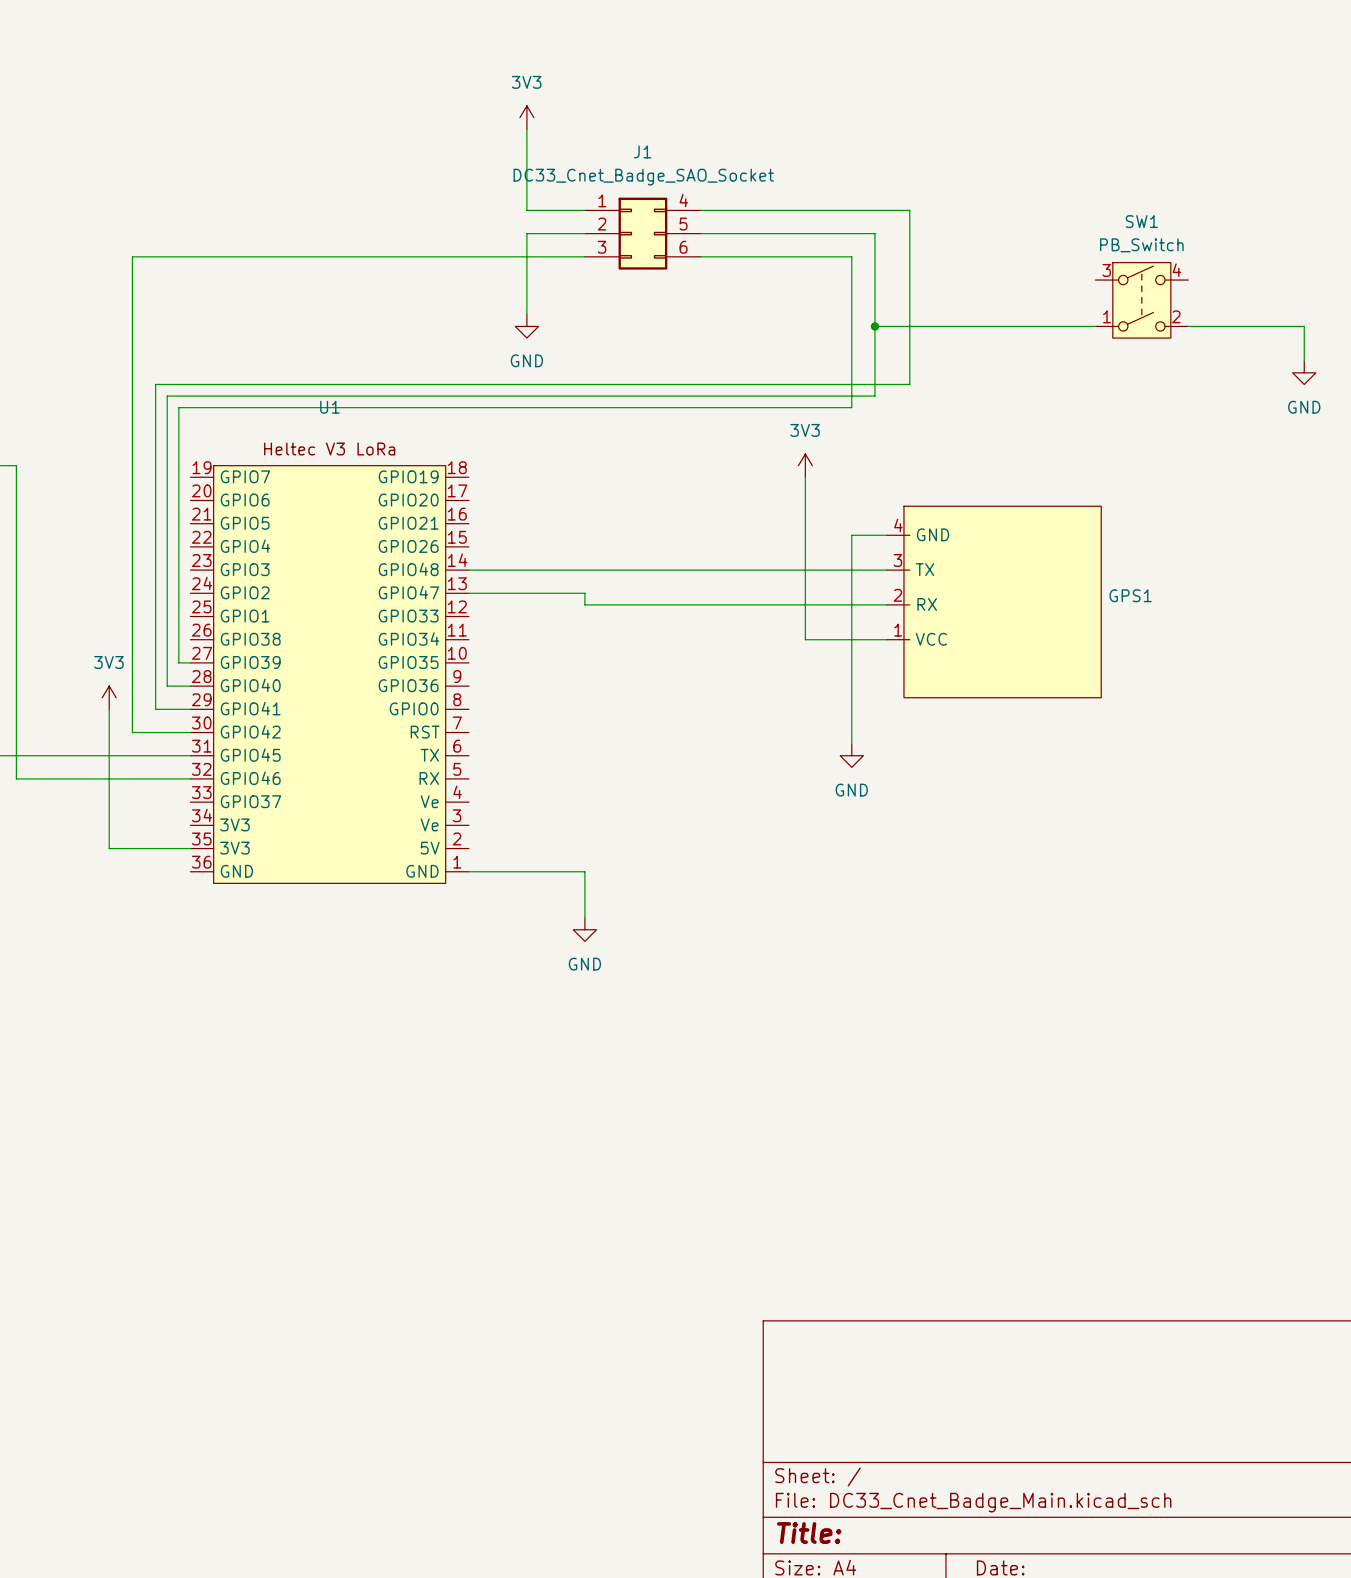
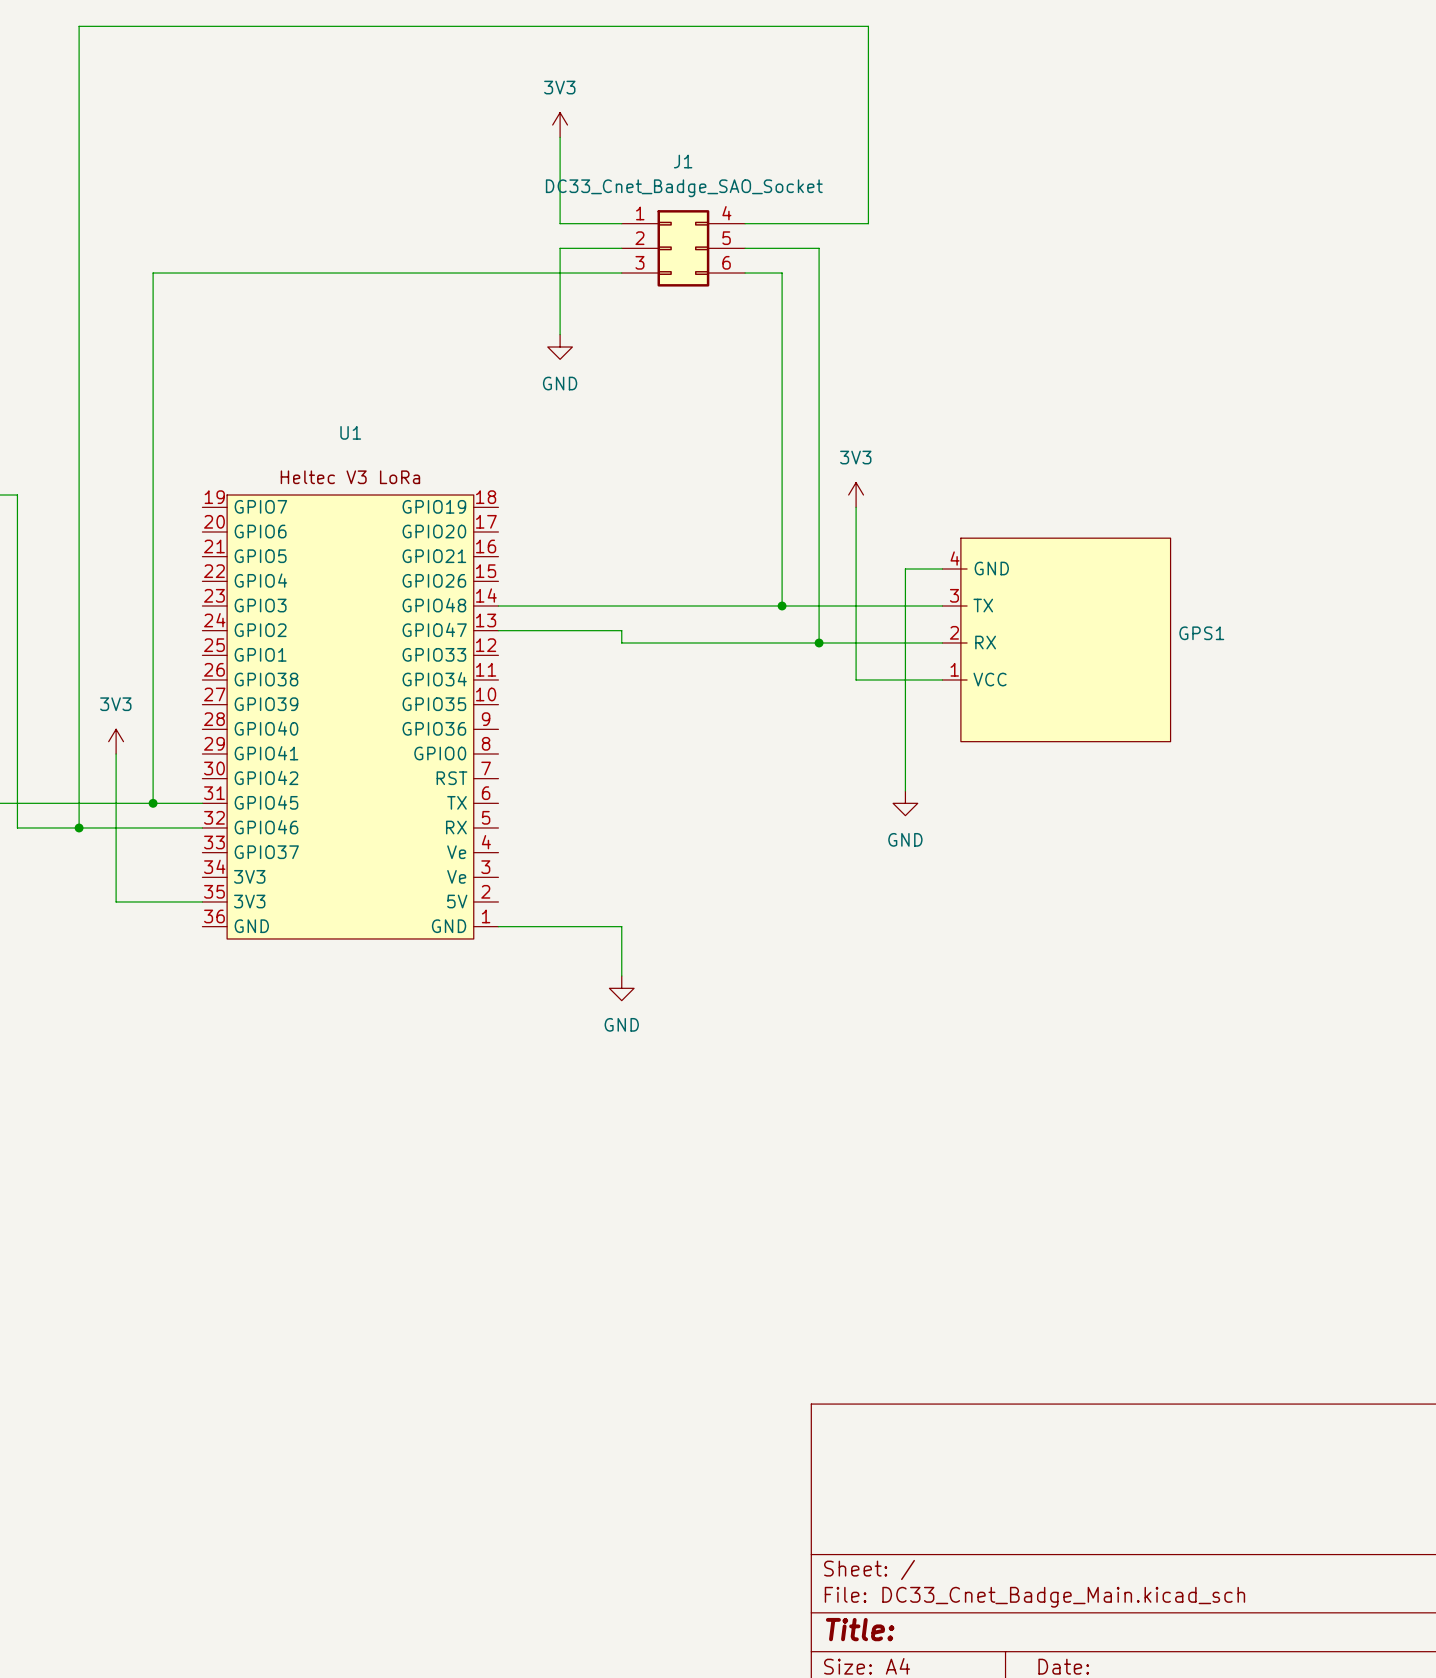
wire: (816, 210) (909, 210) (909, 384) (155, 384) (155, 709) (190, 709) -> (868, 223) (868, 26) (79, 26) (79, 827)
wire: (770, 233) (874, 233) (874, 396) (167, 396) (167, 686) (190, 686) -> (819, 248) (819, 642)
wire: (144, 256) (132, 256) (132, 732) (190, 732) -> (153, 273) (153, 803)
wire: (735, 256) (851, 256) (851, 407) (178, 407) (178, 662) (190, 662) -> (782, 273) (782, 605)
SW1: PB_Switch (1141, 300) -> none
wire: (874, 326) (1095, 326) -> none
junction: (874, 326) -> none
wire: (1188, 326) (1304, 326) (1304, 361) -> none
power symbol: GND (1304, 372) -> none
junction: none -> (782, 605)
junction: none -> (819, 642)
junction: none -> (153, 803)
junction: none -> (79, 827)

